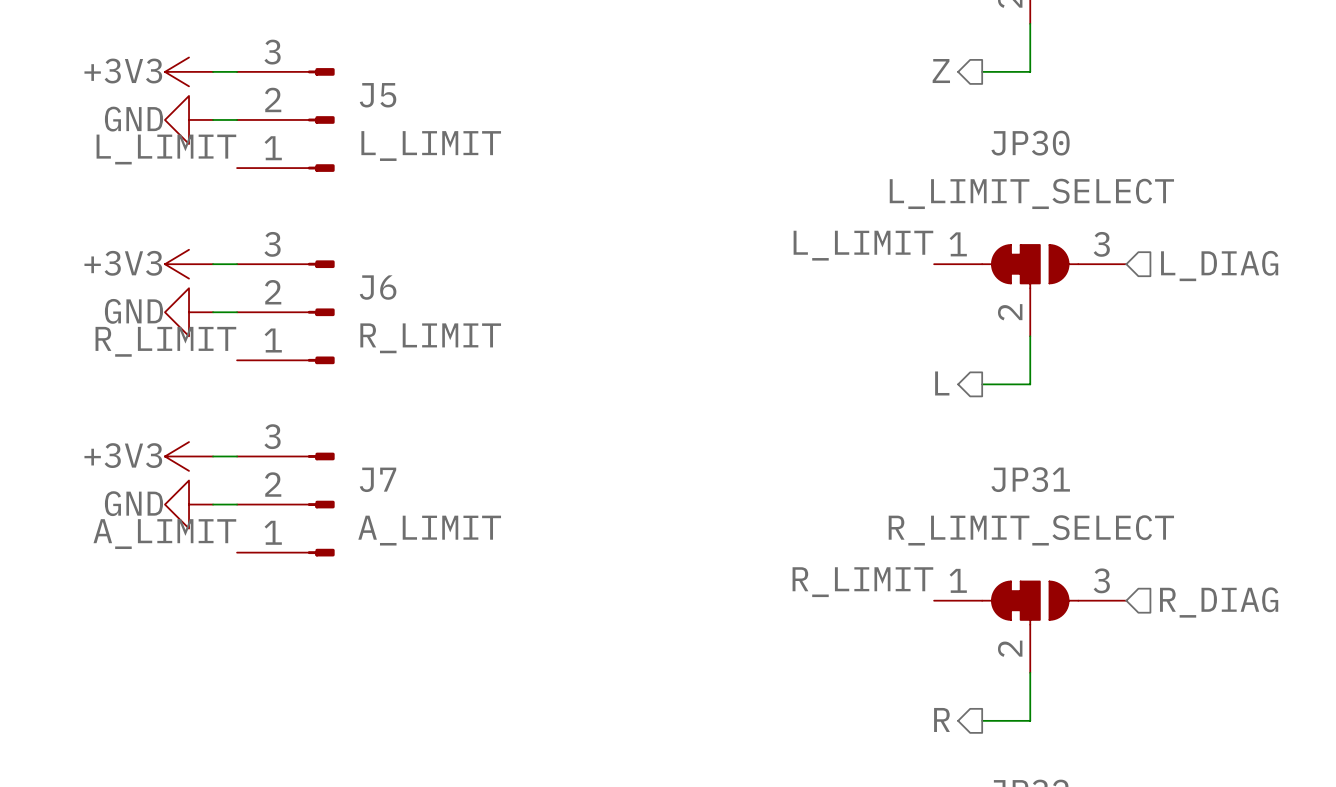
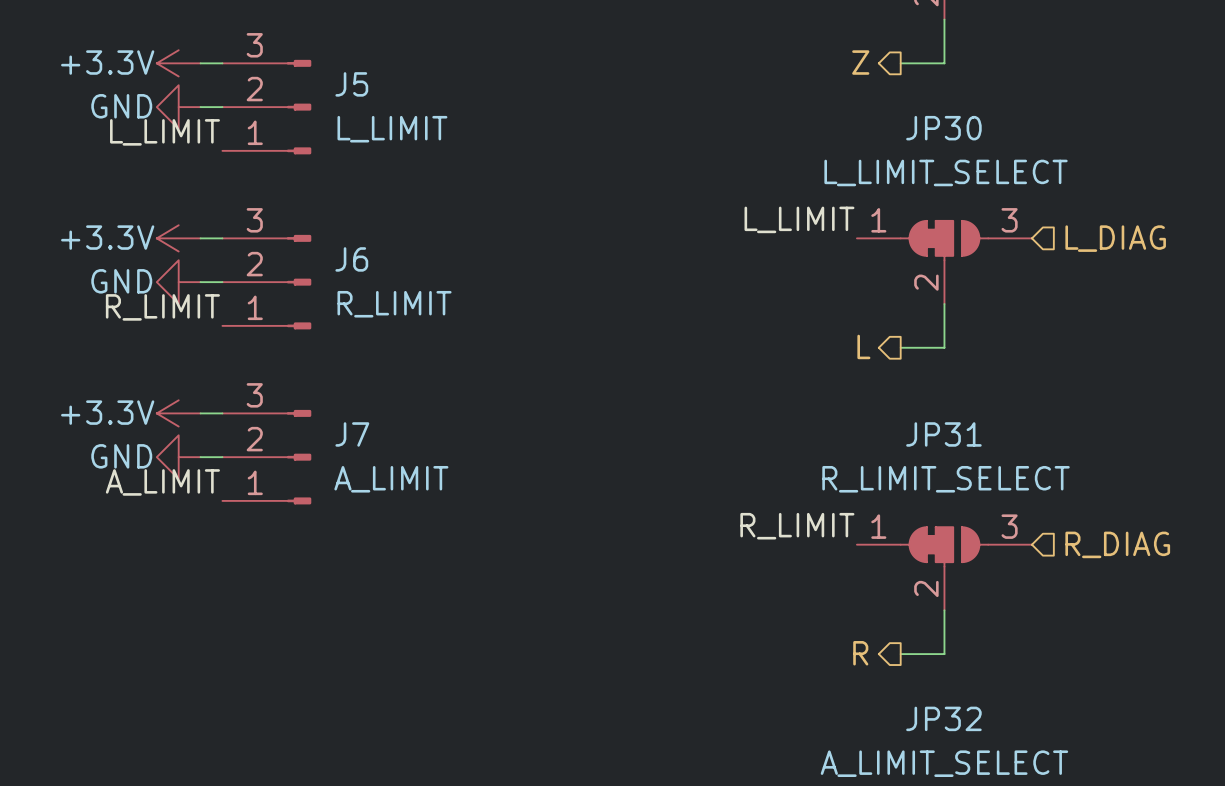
power symbol: +3V3 (189, 71) -> +3.3V (178, 63)
power symbol: +3V3 (189, 264) -> +3.3V (178, 238)
power symbol: +3V3 (189, 456) -> +3.3V (178, 413)

